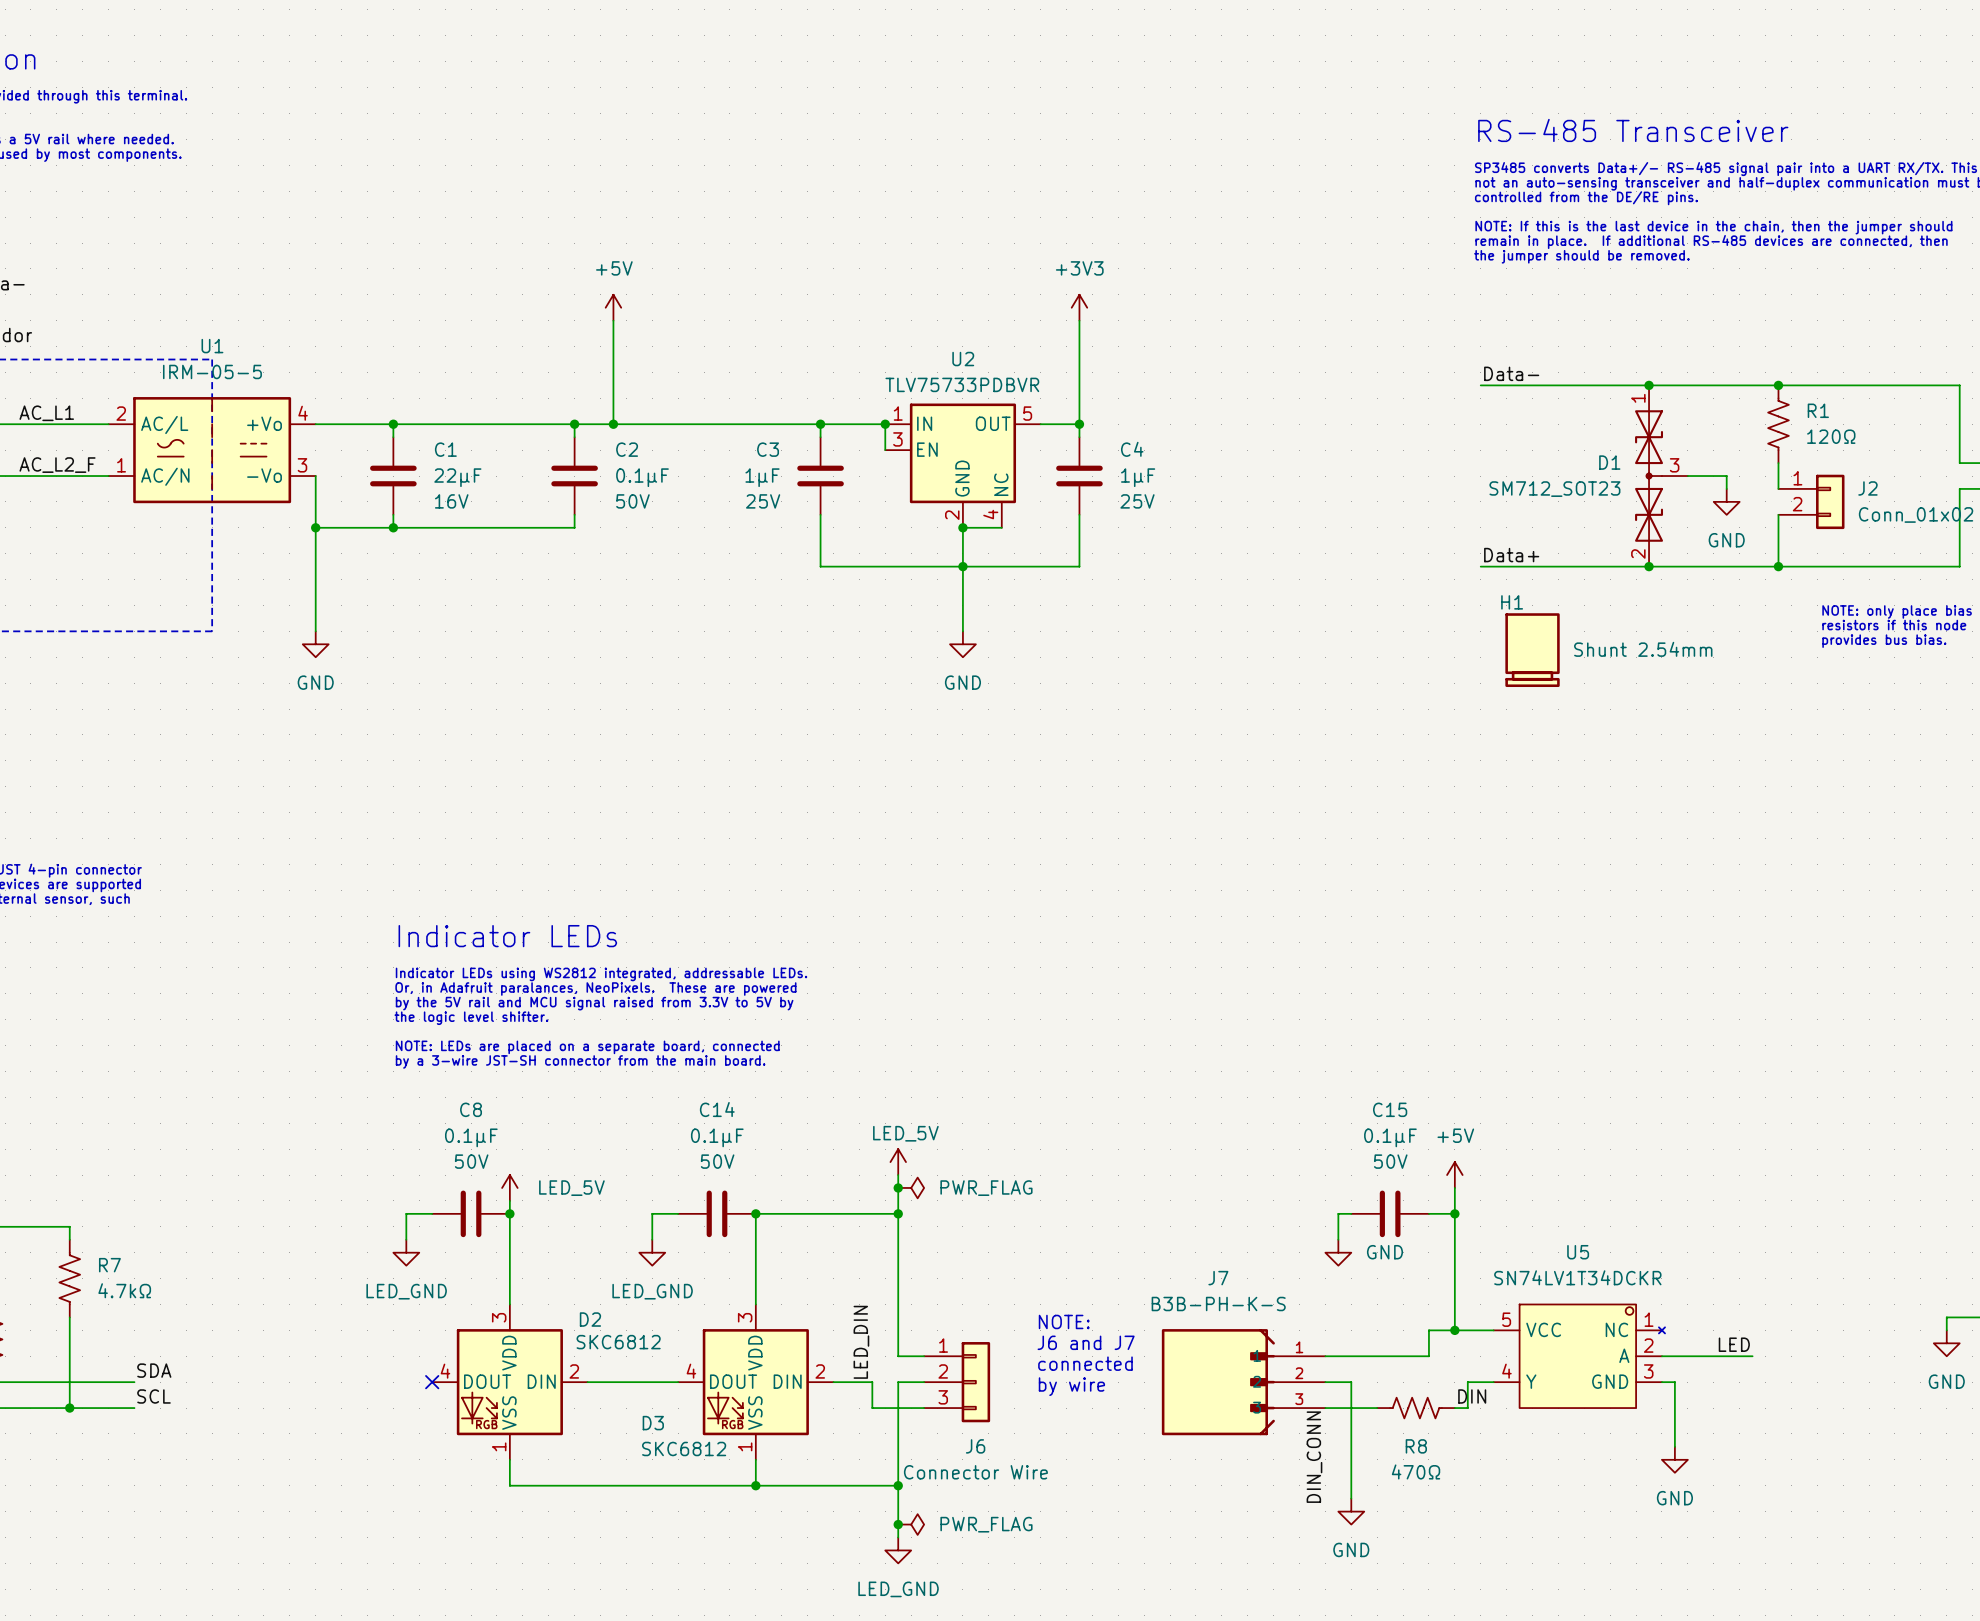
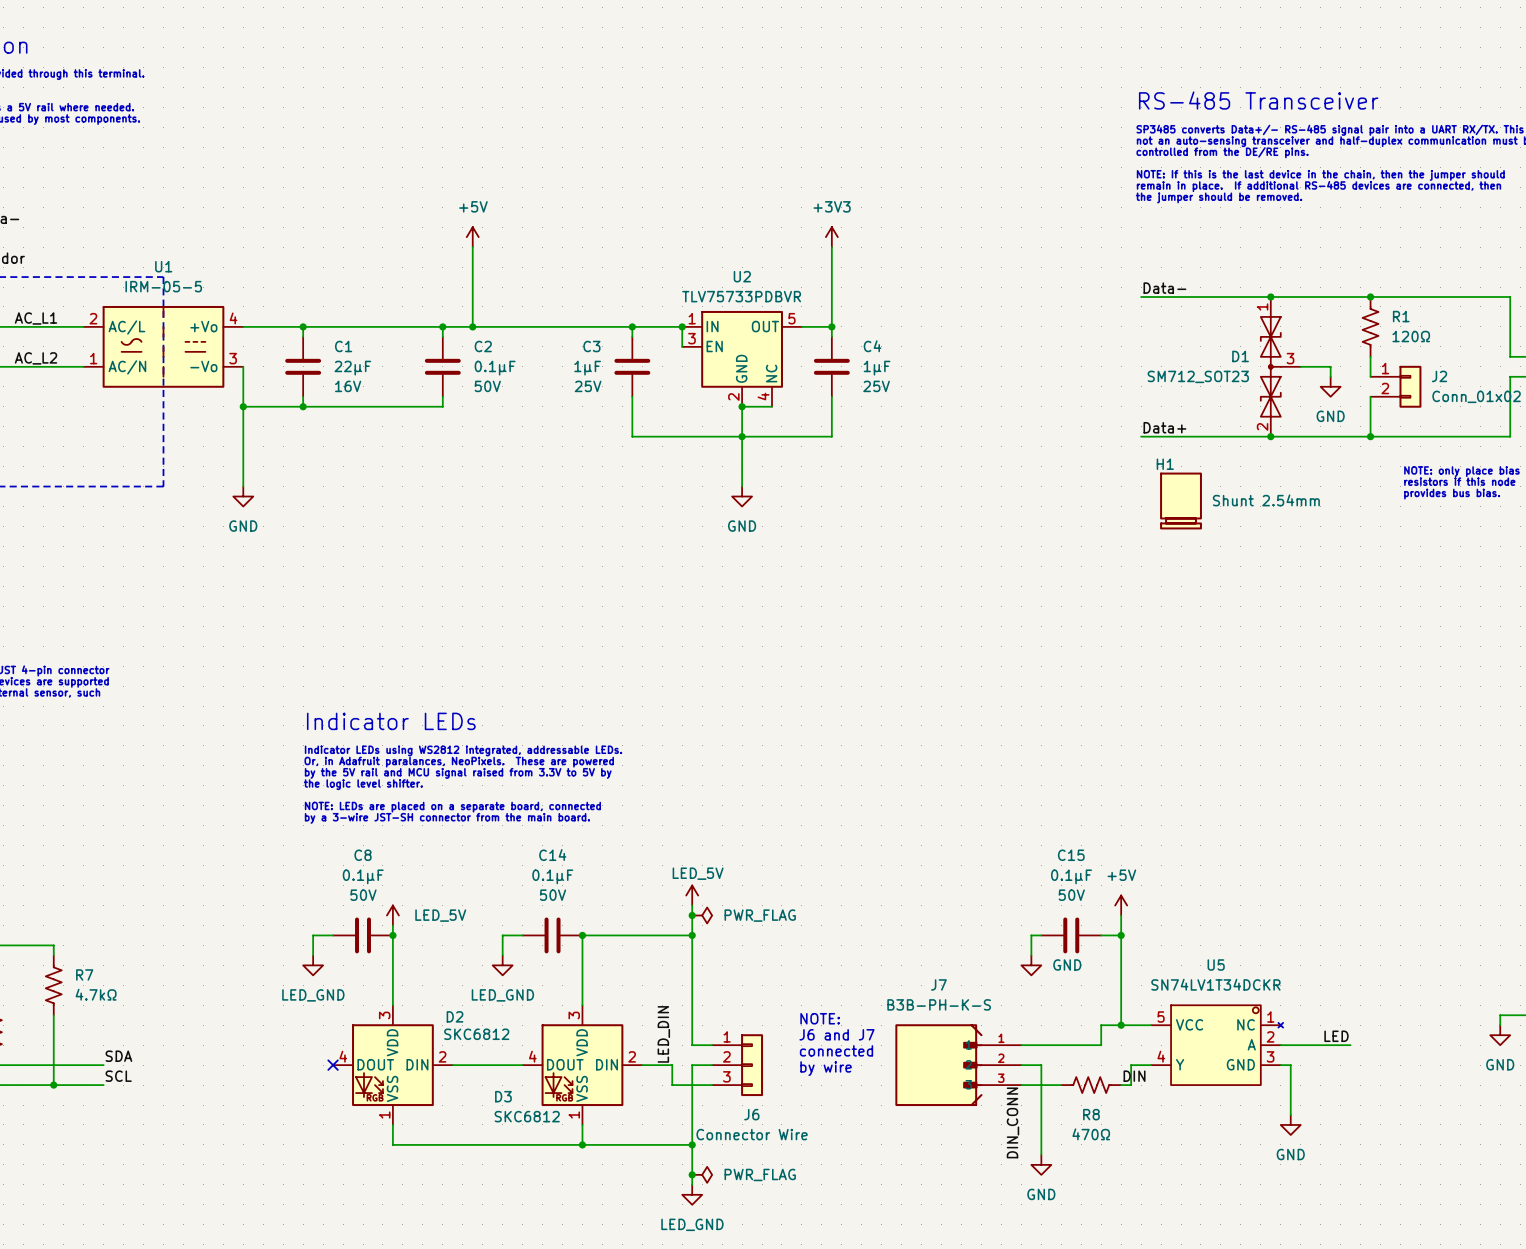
label: AC_L2_F (57, 465) -> AC_L2 (36, 358)

